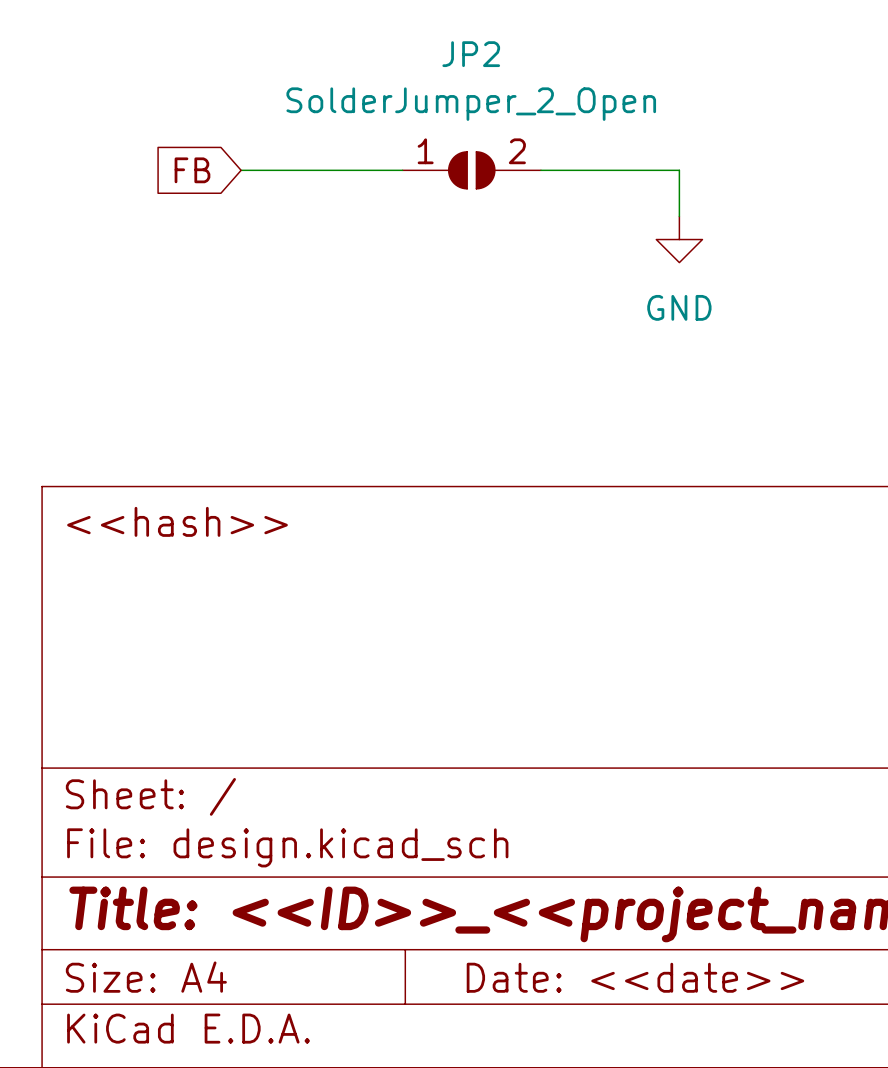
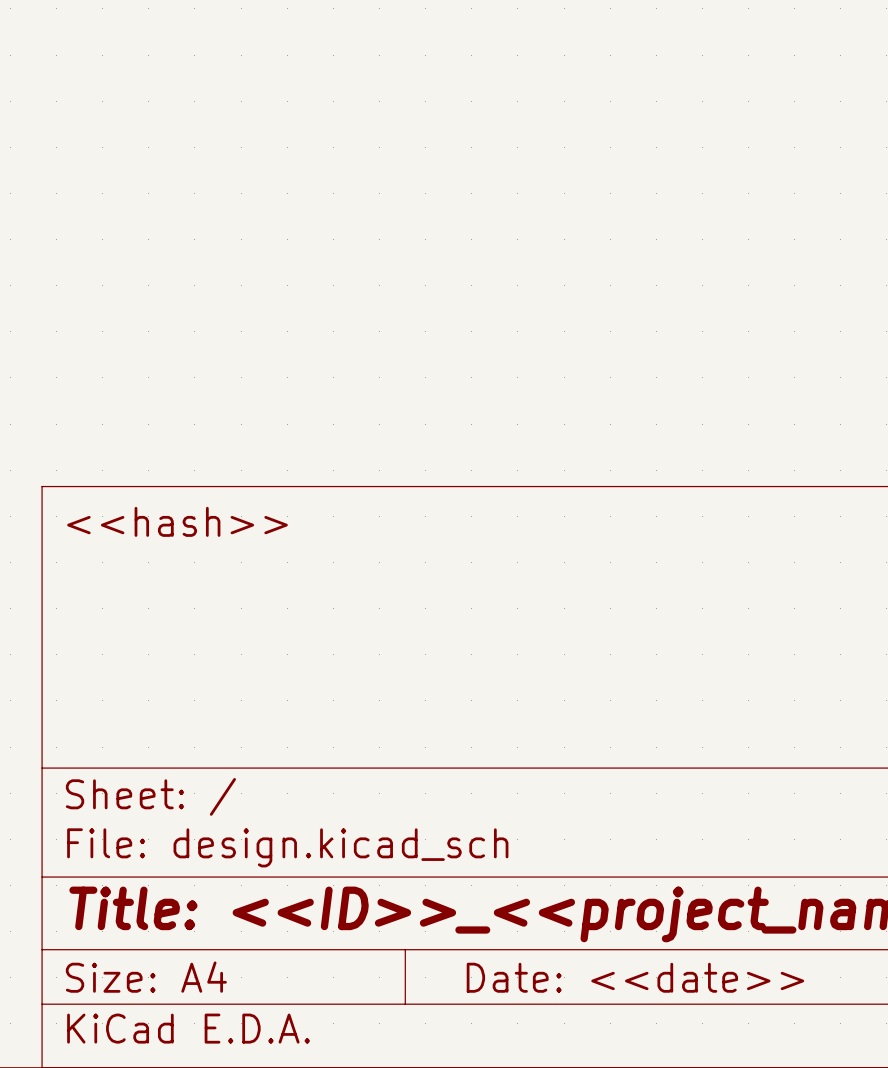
global label: FB (192, 170) -> none
wire: (241, 170) (402, 170) -> none
JP2: SolderJumper_2_Open (471, 170) -> none
wire: (540, 170) (679, 170) (679, 216) -> none
power symbol: GND (679, 239) -> none

